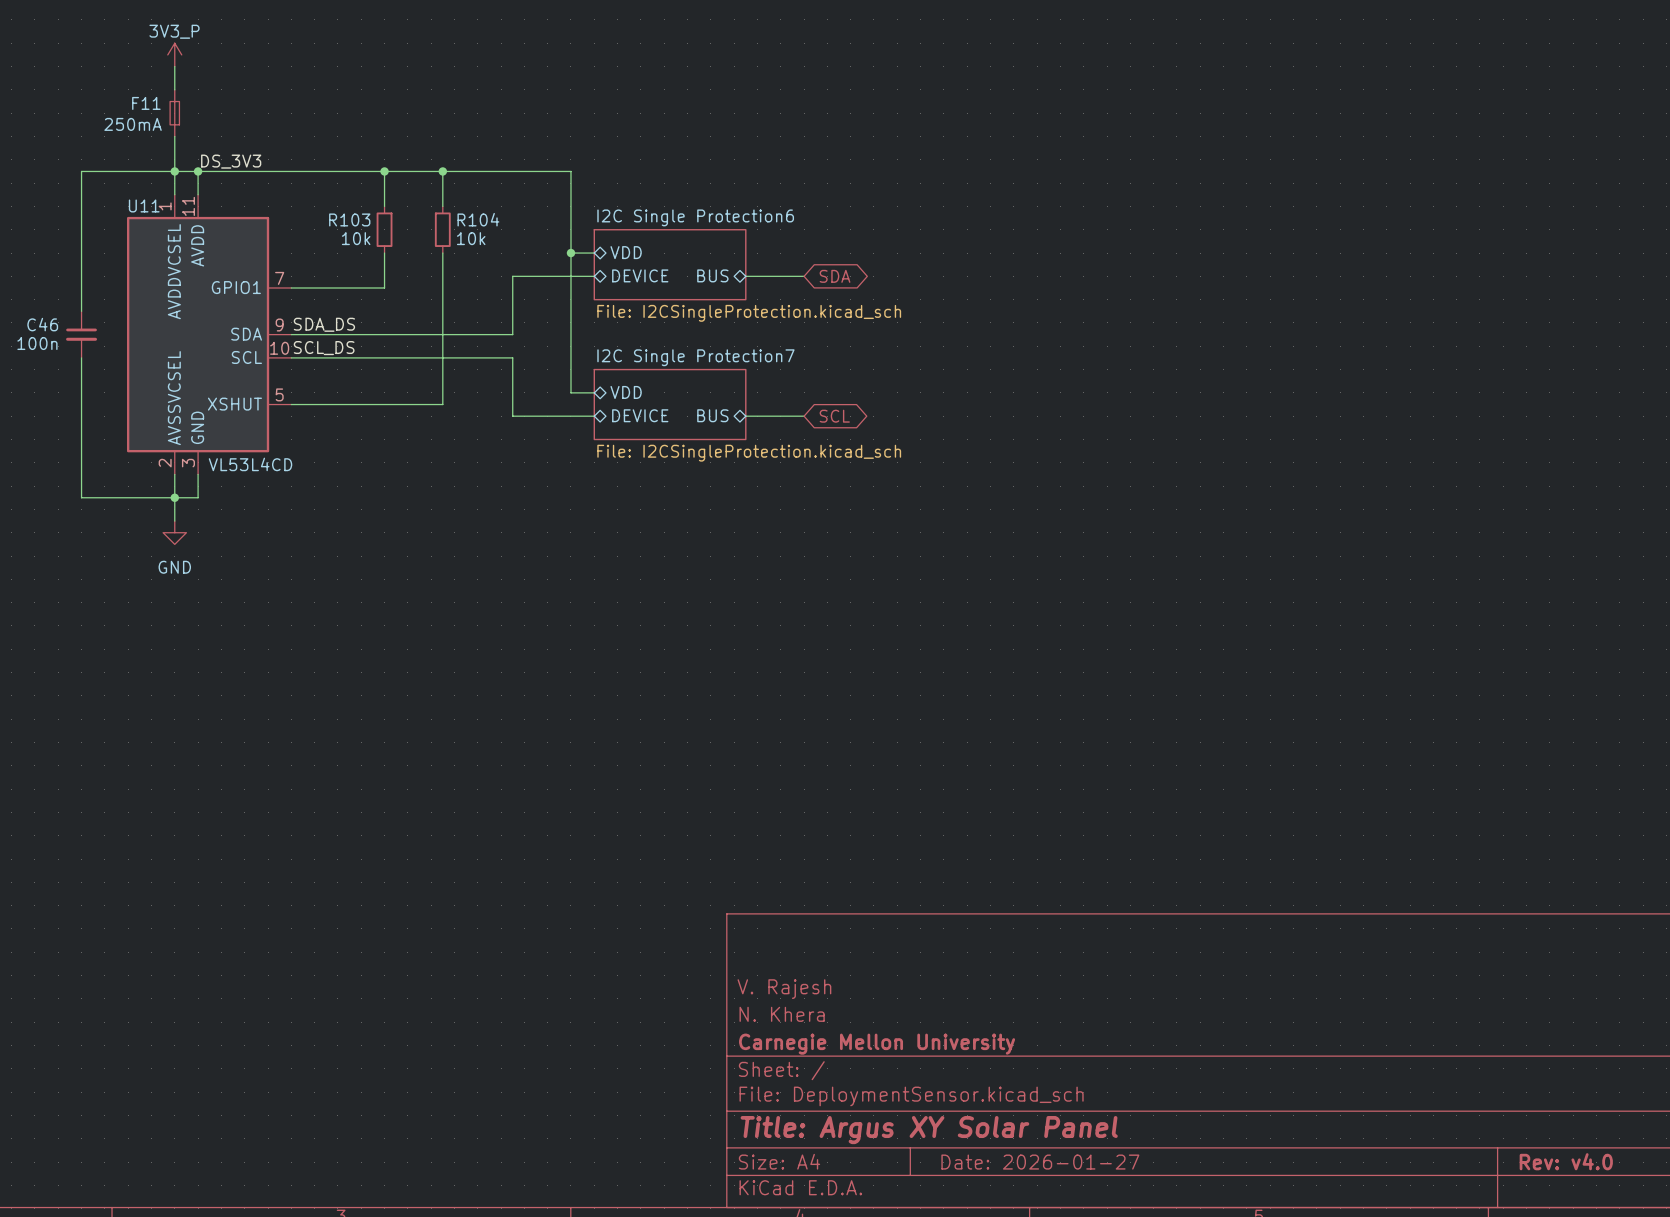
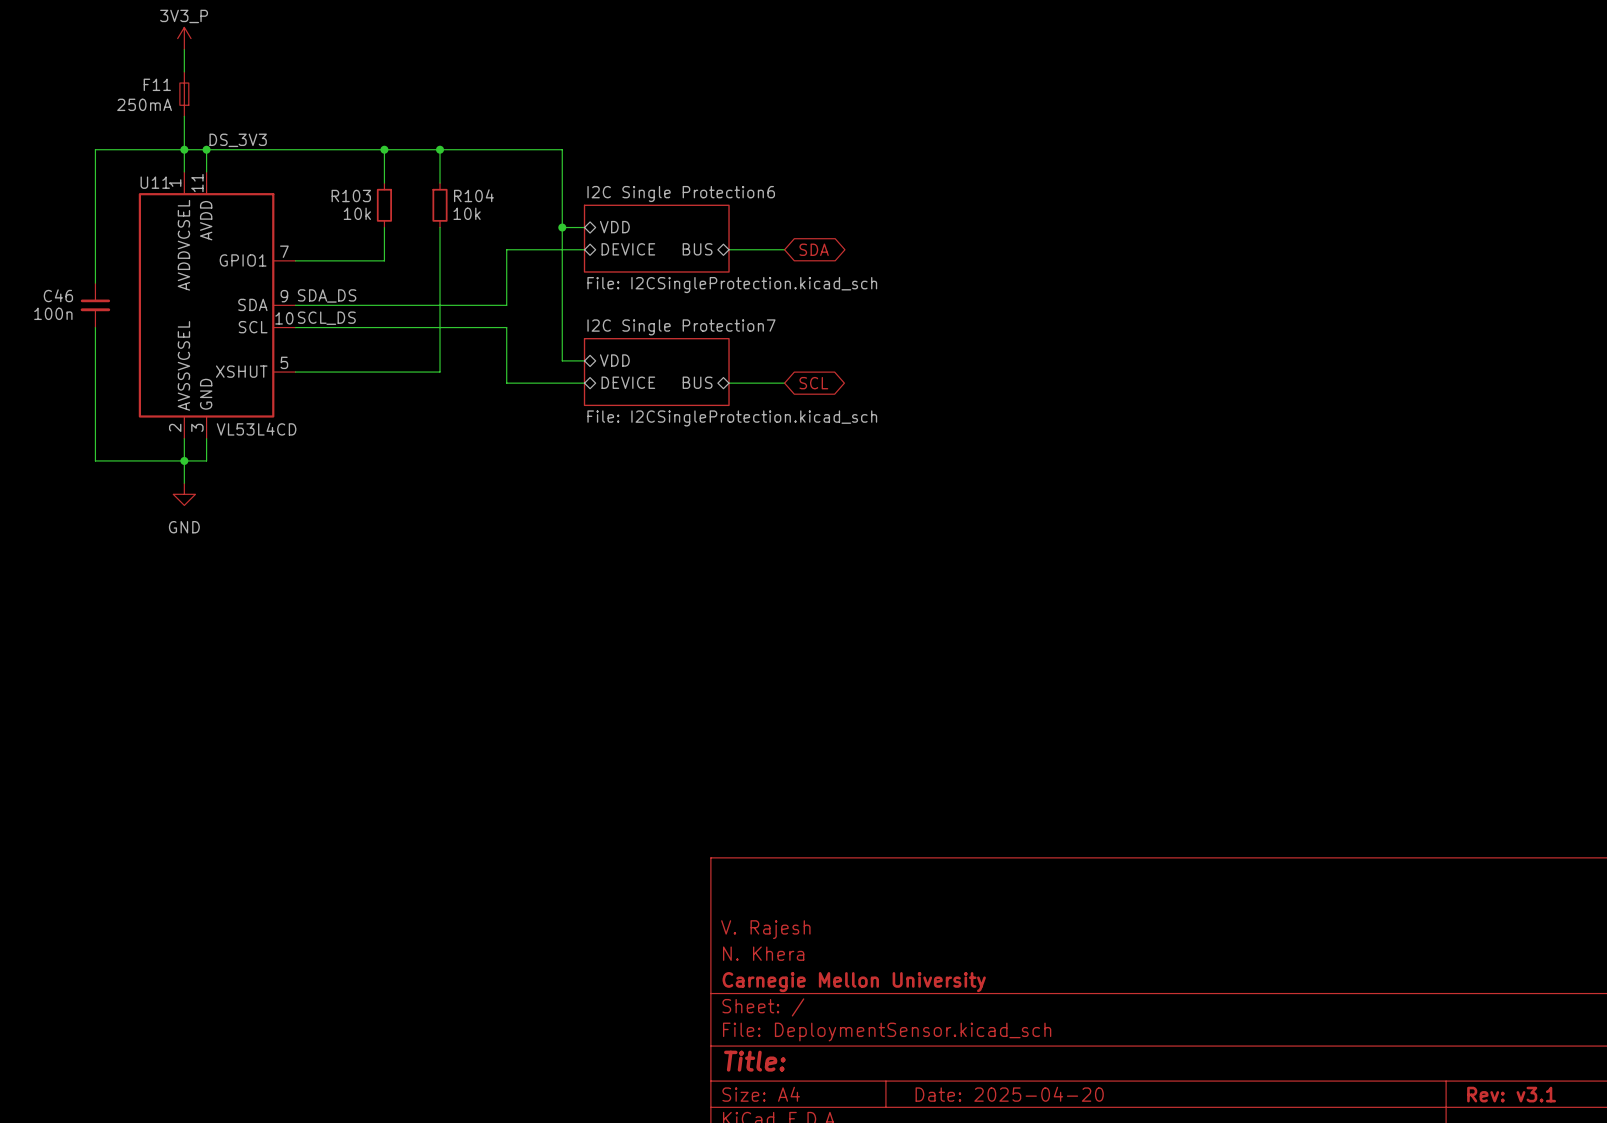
title block: Title: Argus XY Solar Panel (929, 1130) -> Title: (754, 1061)
title block: Rev: v4.0 (1566, 1161) -> Rev: v3.1 (1511, 1094)
title block: Date: 2026-01-27 (1040, 1162) -> Date: 2025-04-20 (1009, 1094)

